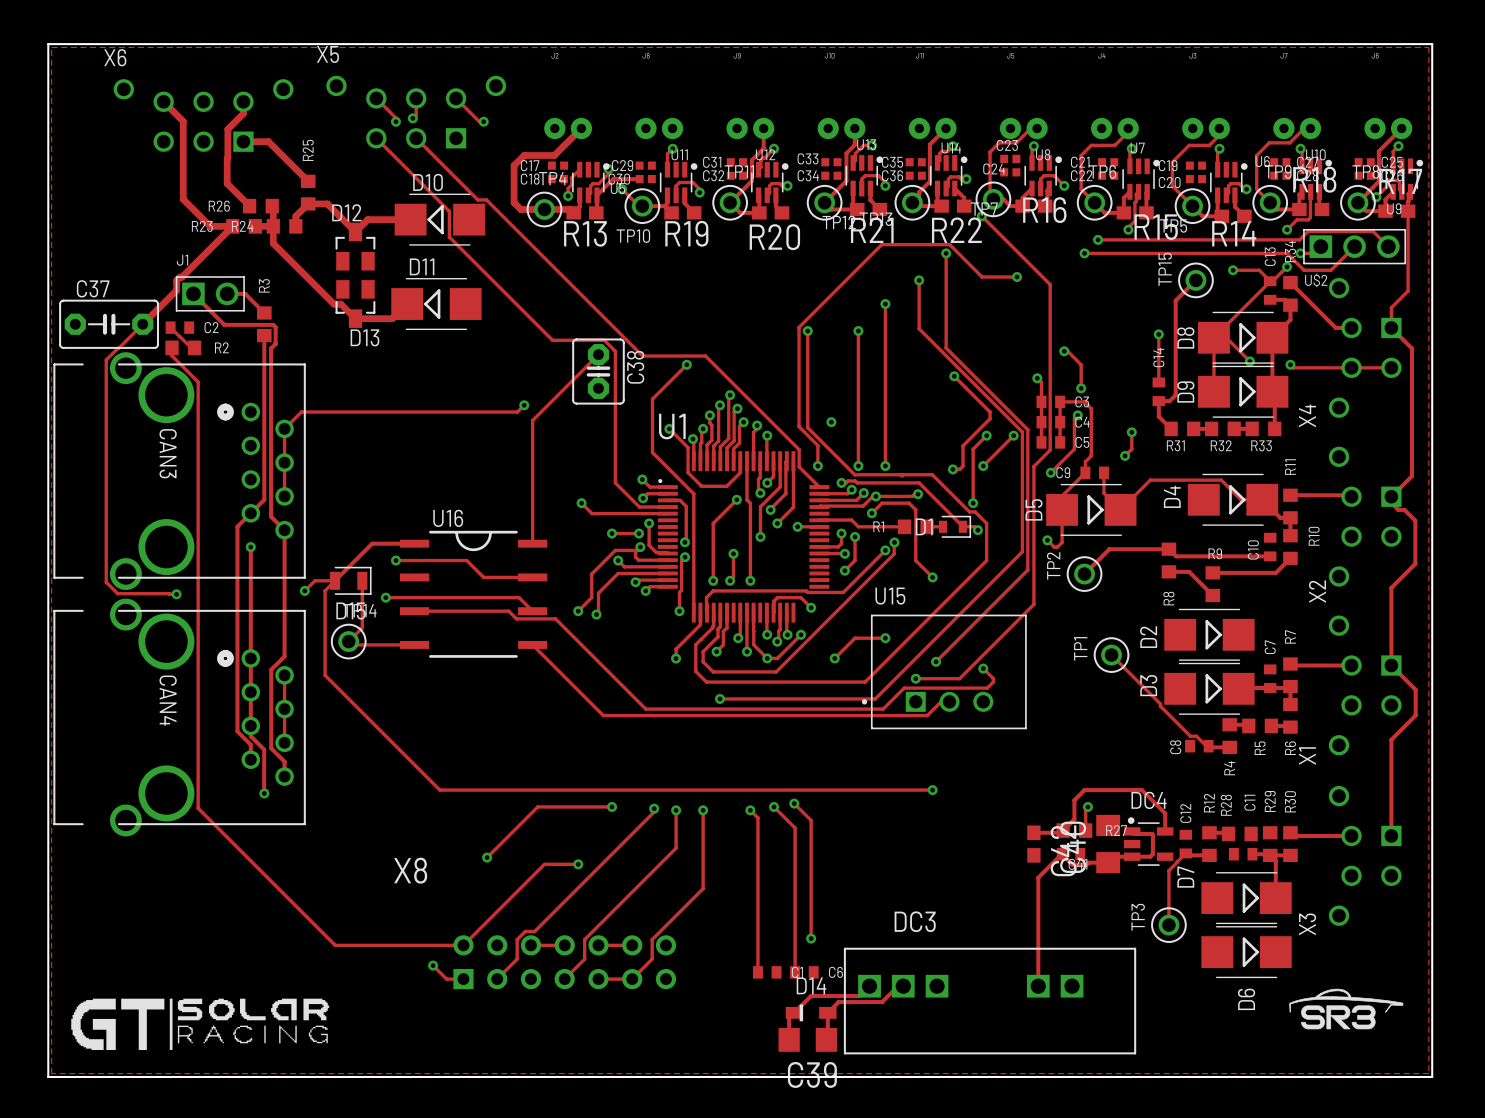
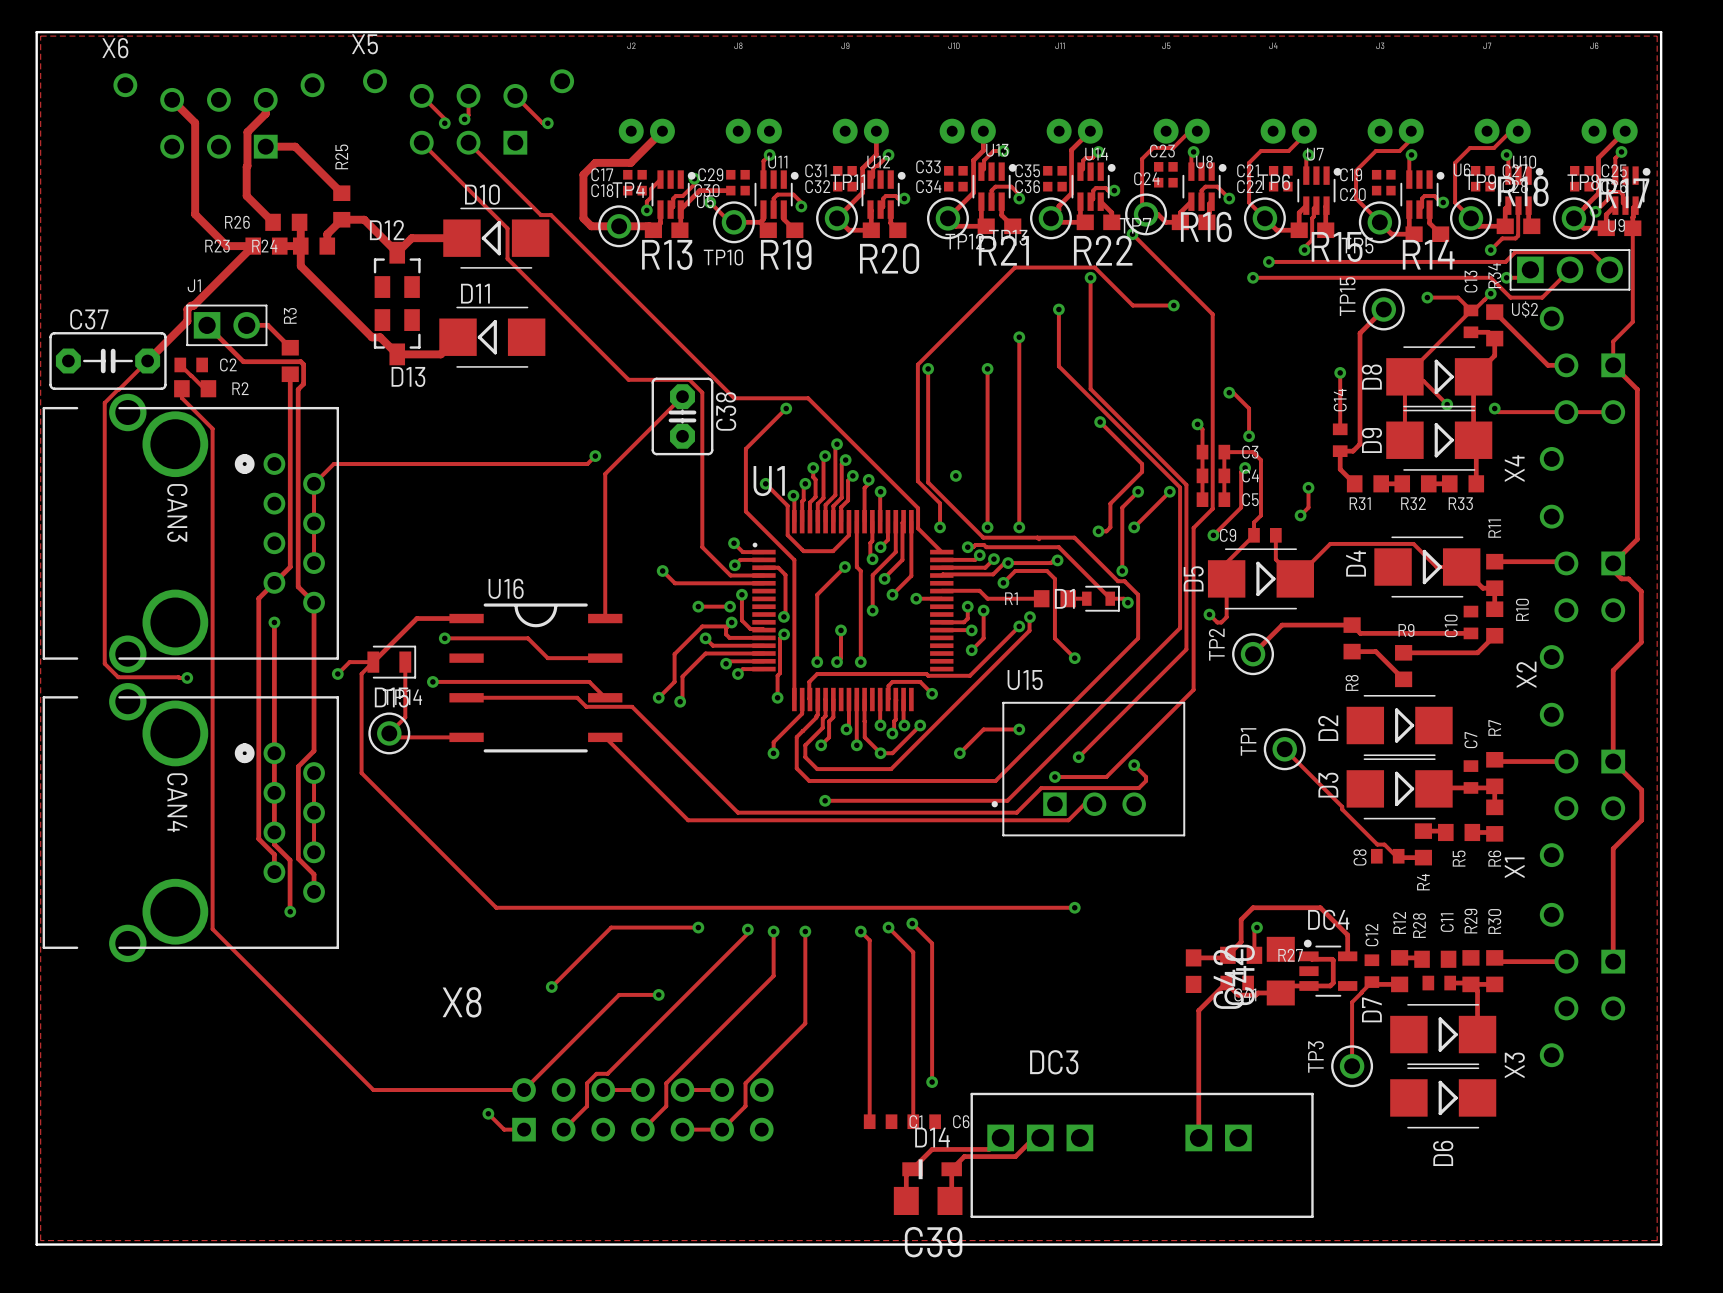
drawing: [1289, 988, 1404, 1030] -> none
drawing: [71, 998, 330, 1050] -> none

